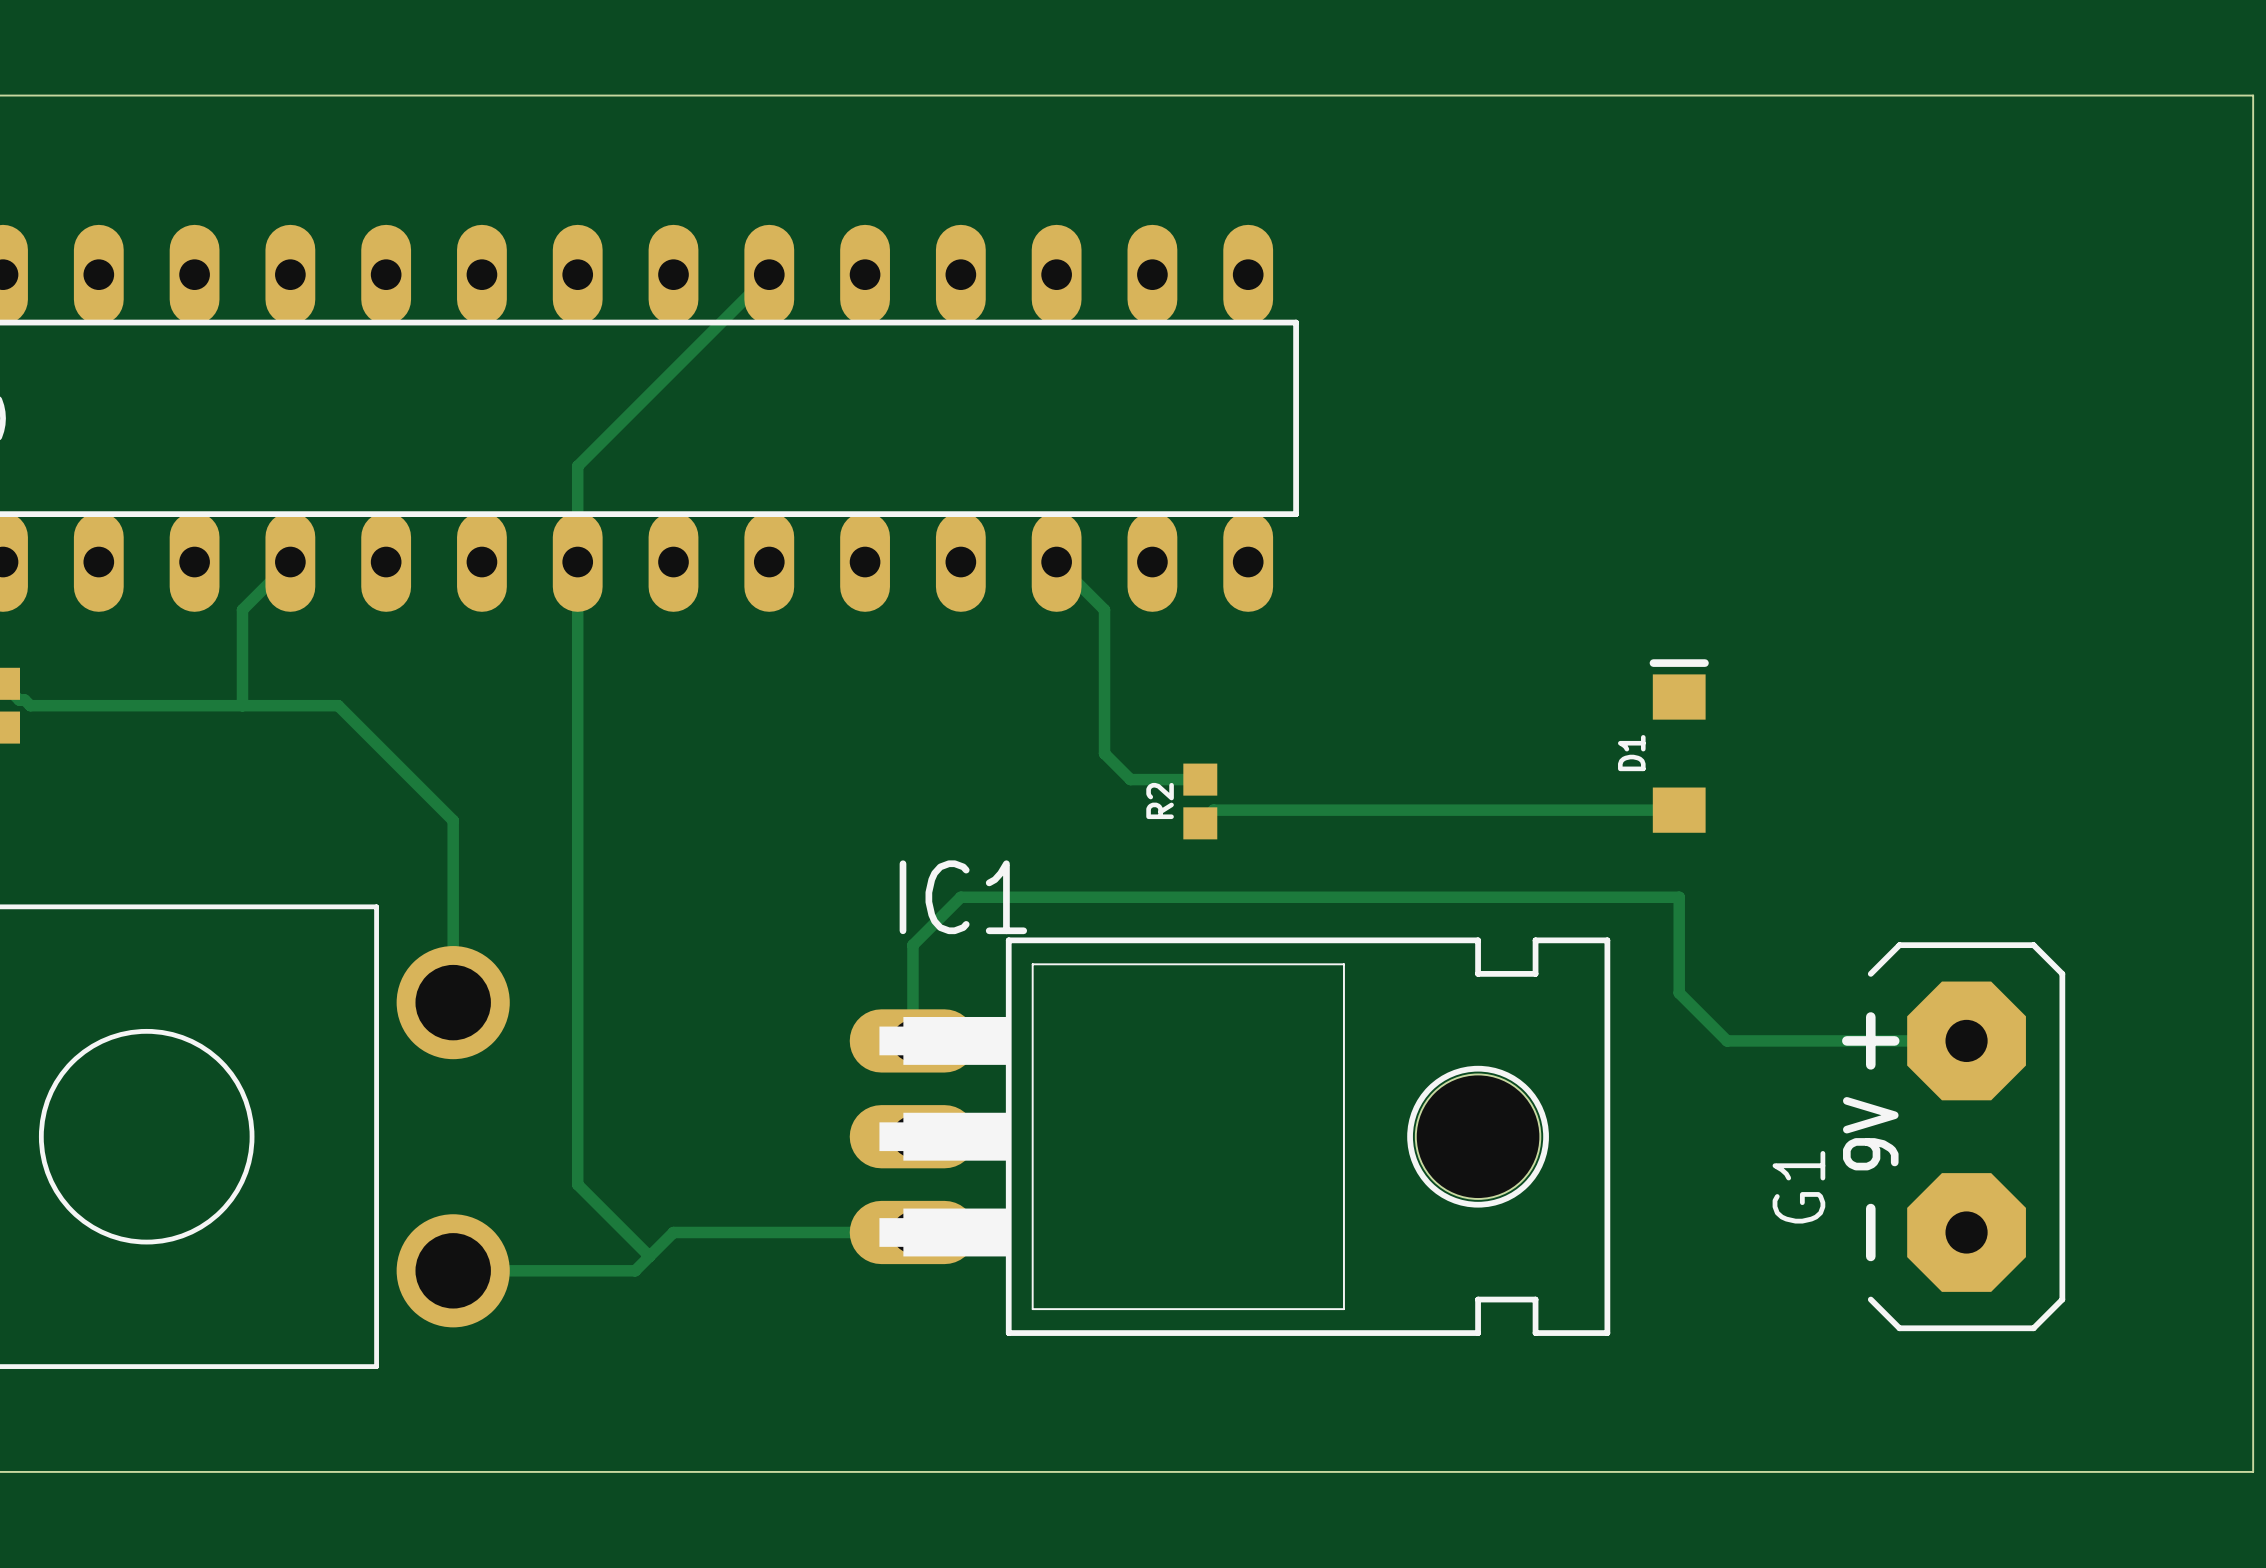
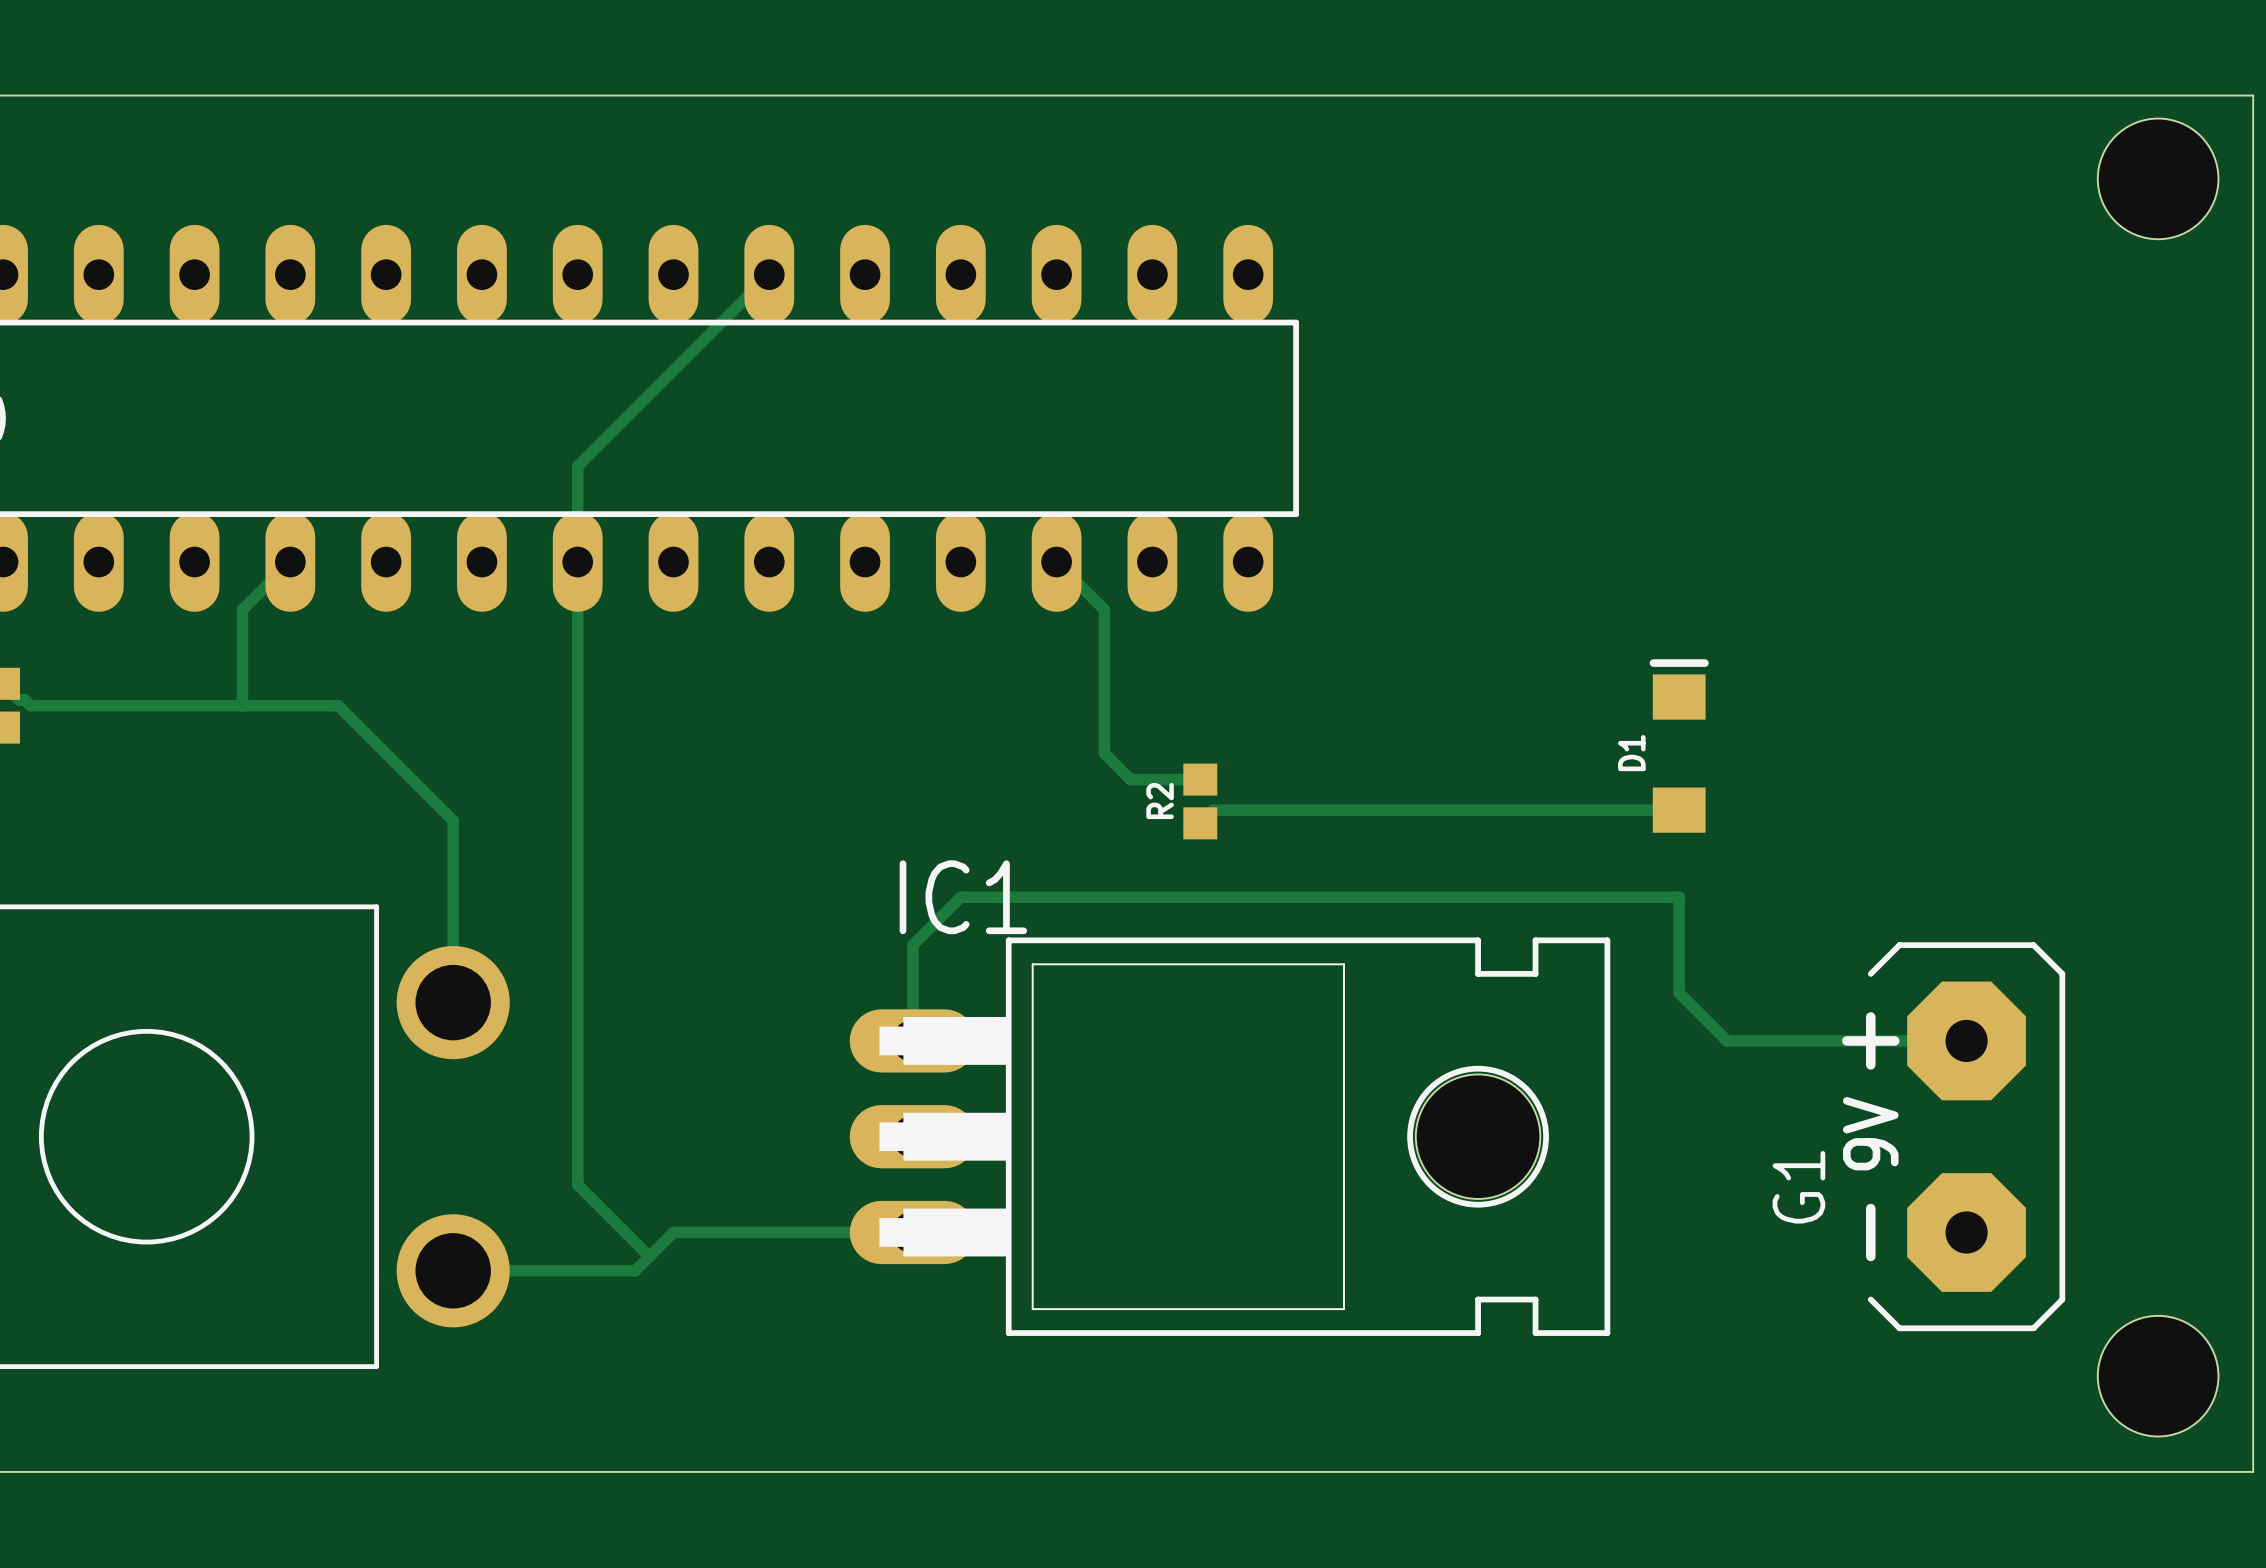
hole: none -> (2158, 178)
hole: none -> (2158, 1376)

